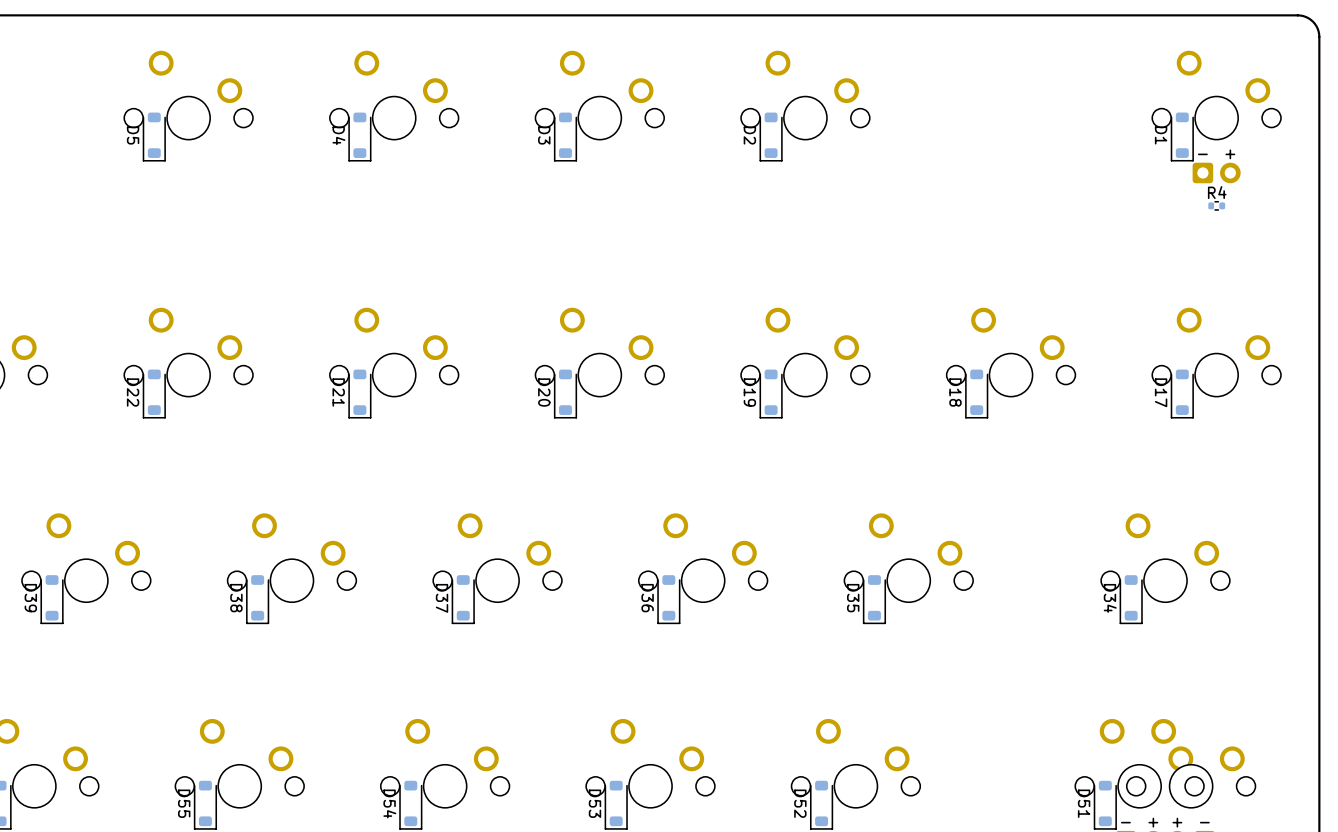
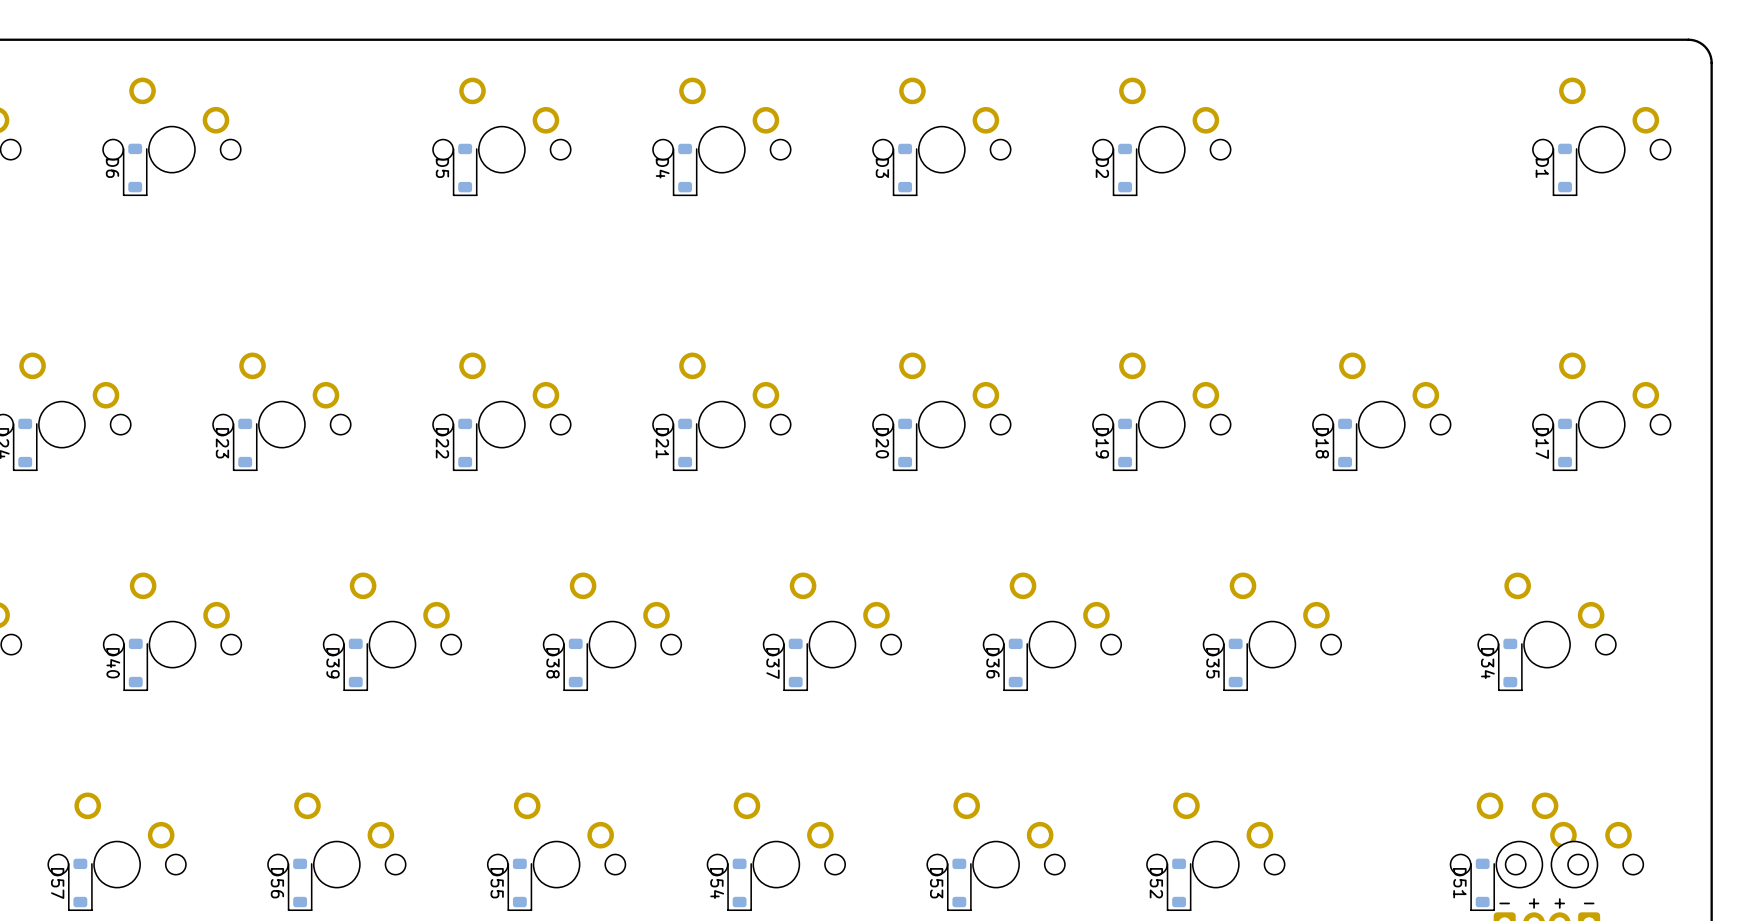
part: (1216, 172) -> none
R4: (1216, 205) -> none

